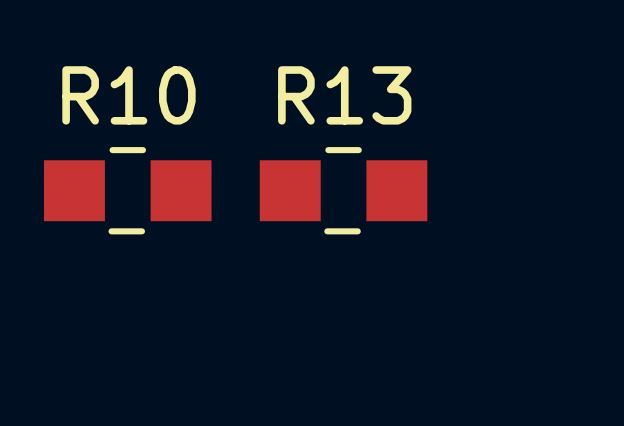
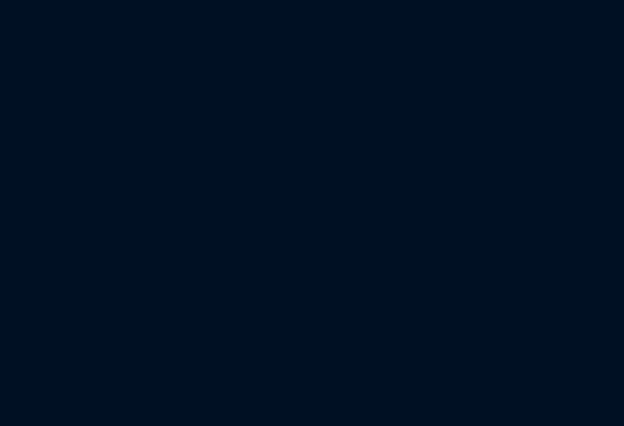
R10: (127, 190) -> none
R13: (343, 190) -> none

